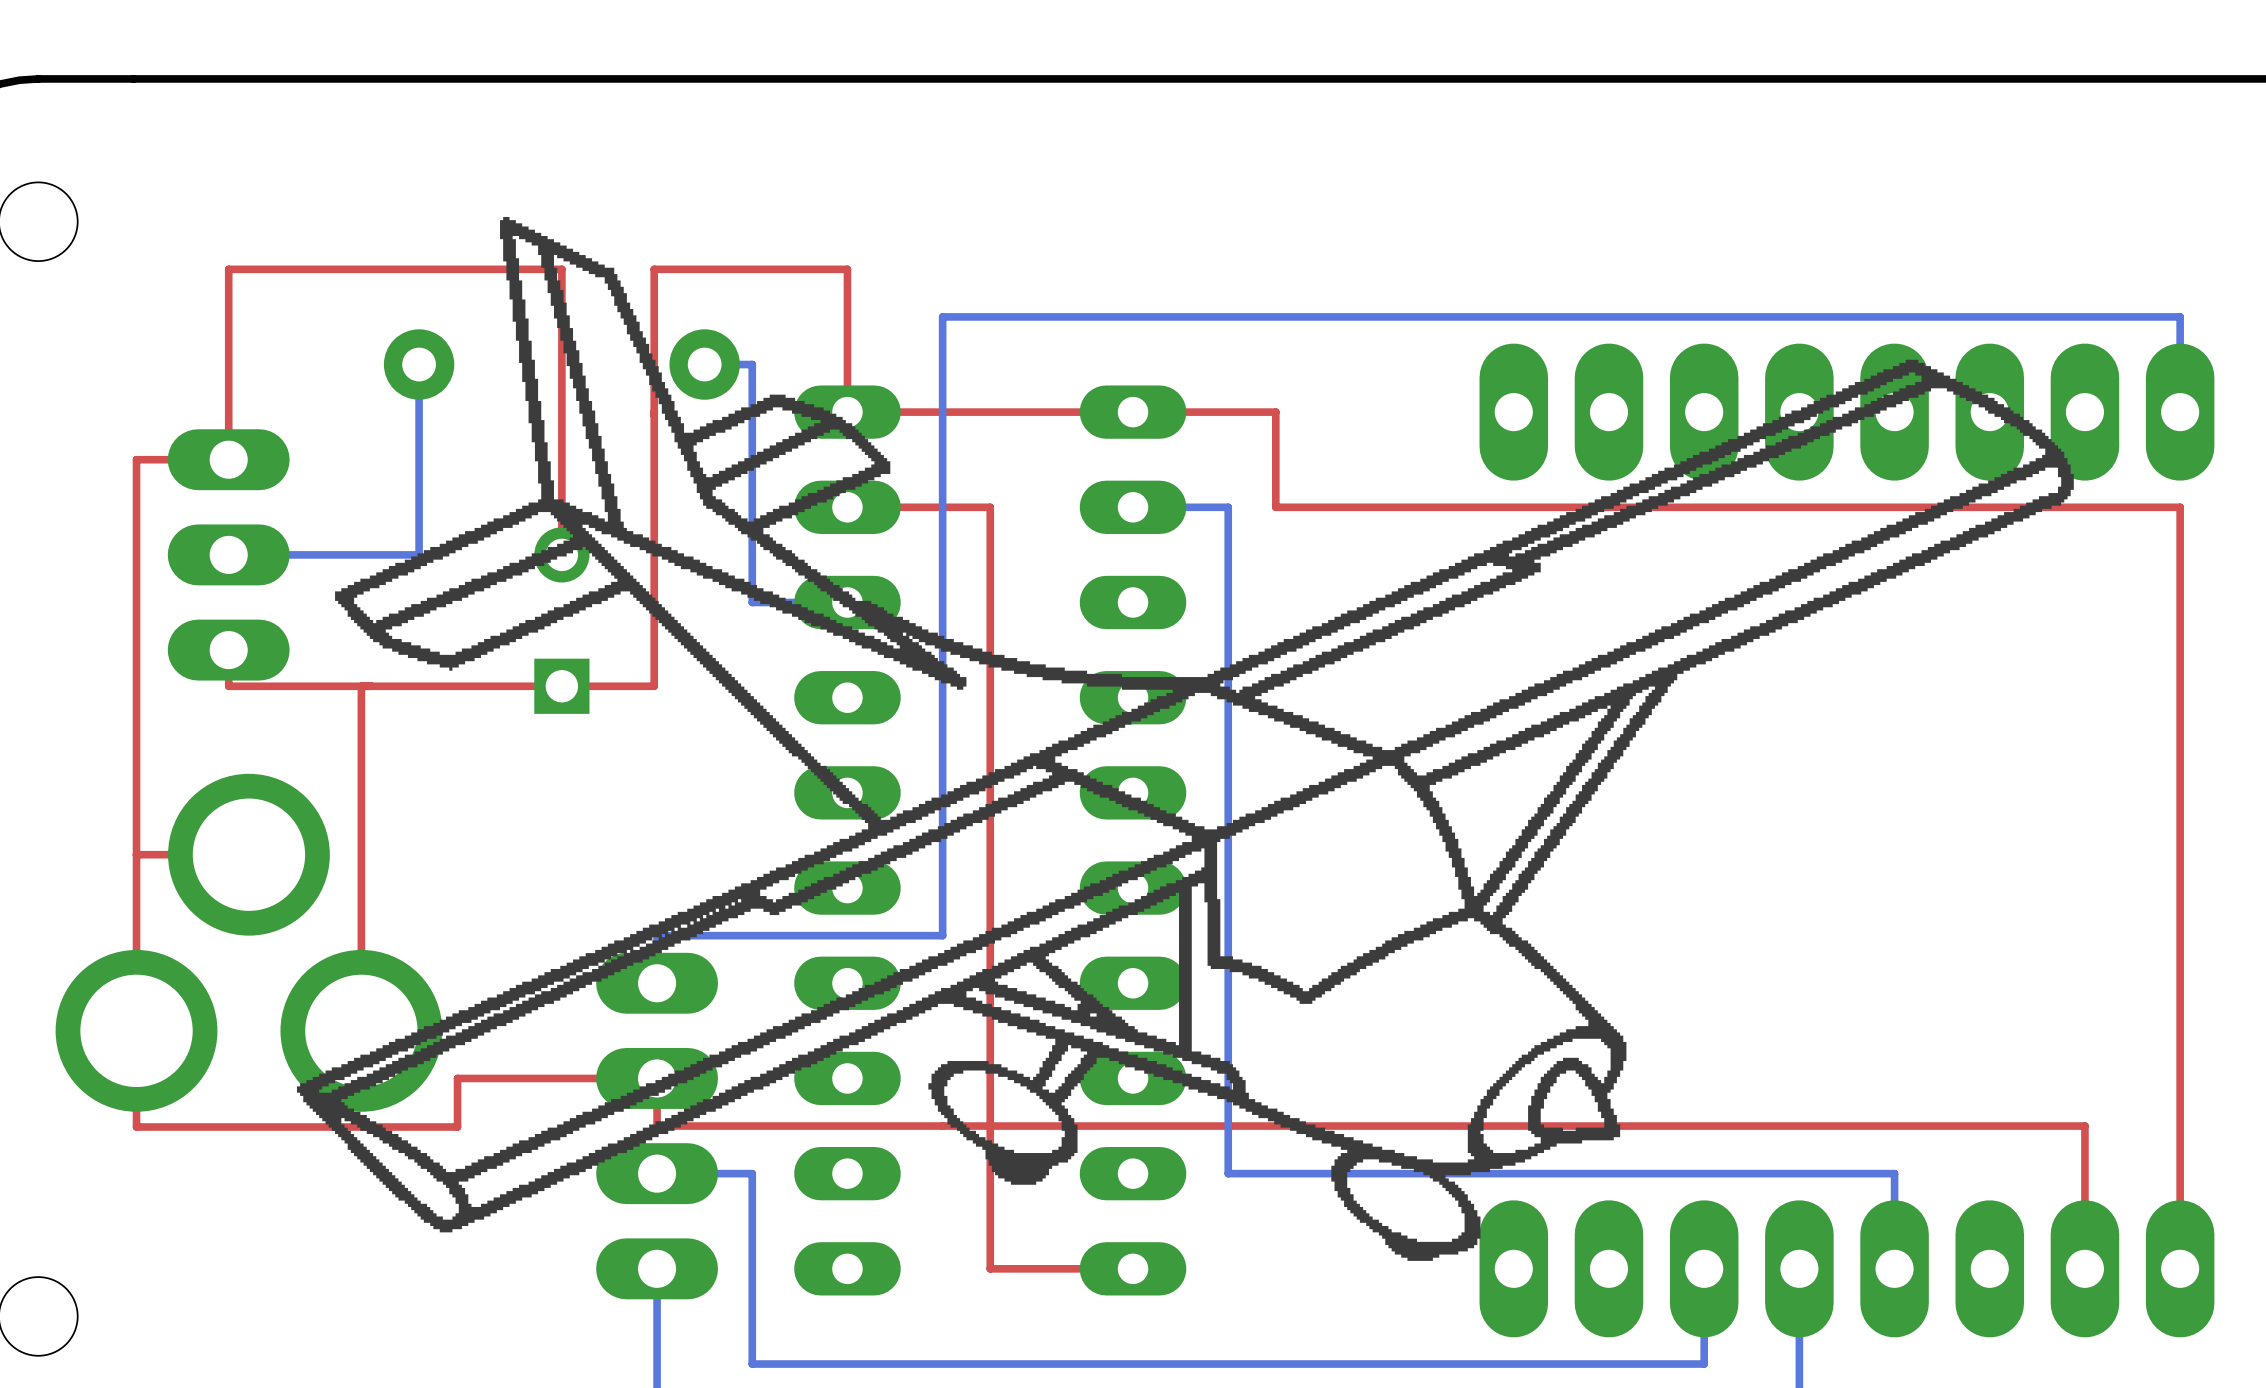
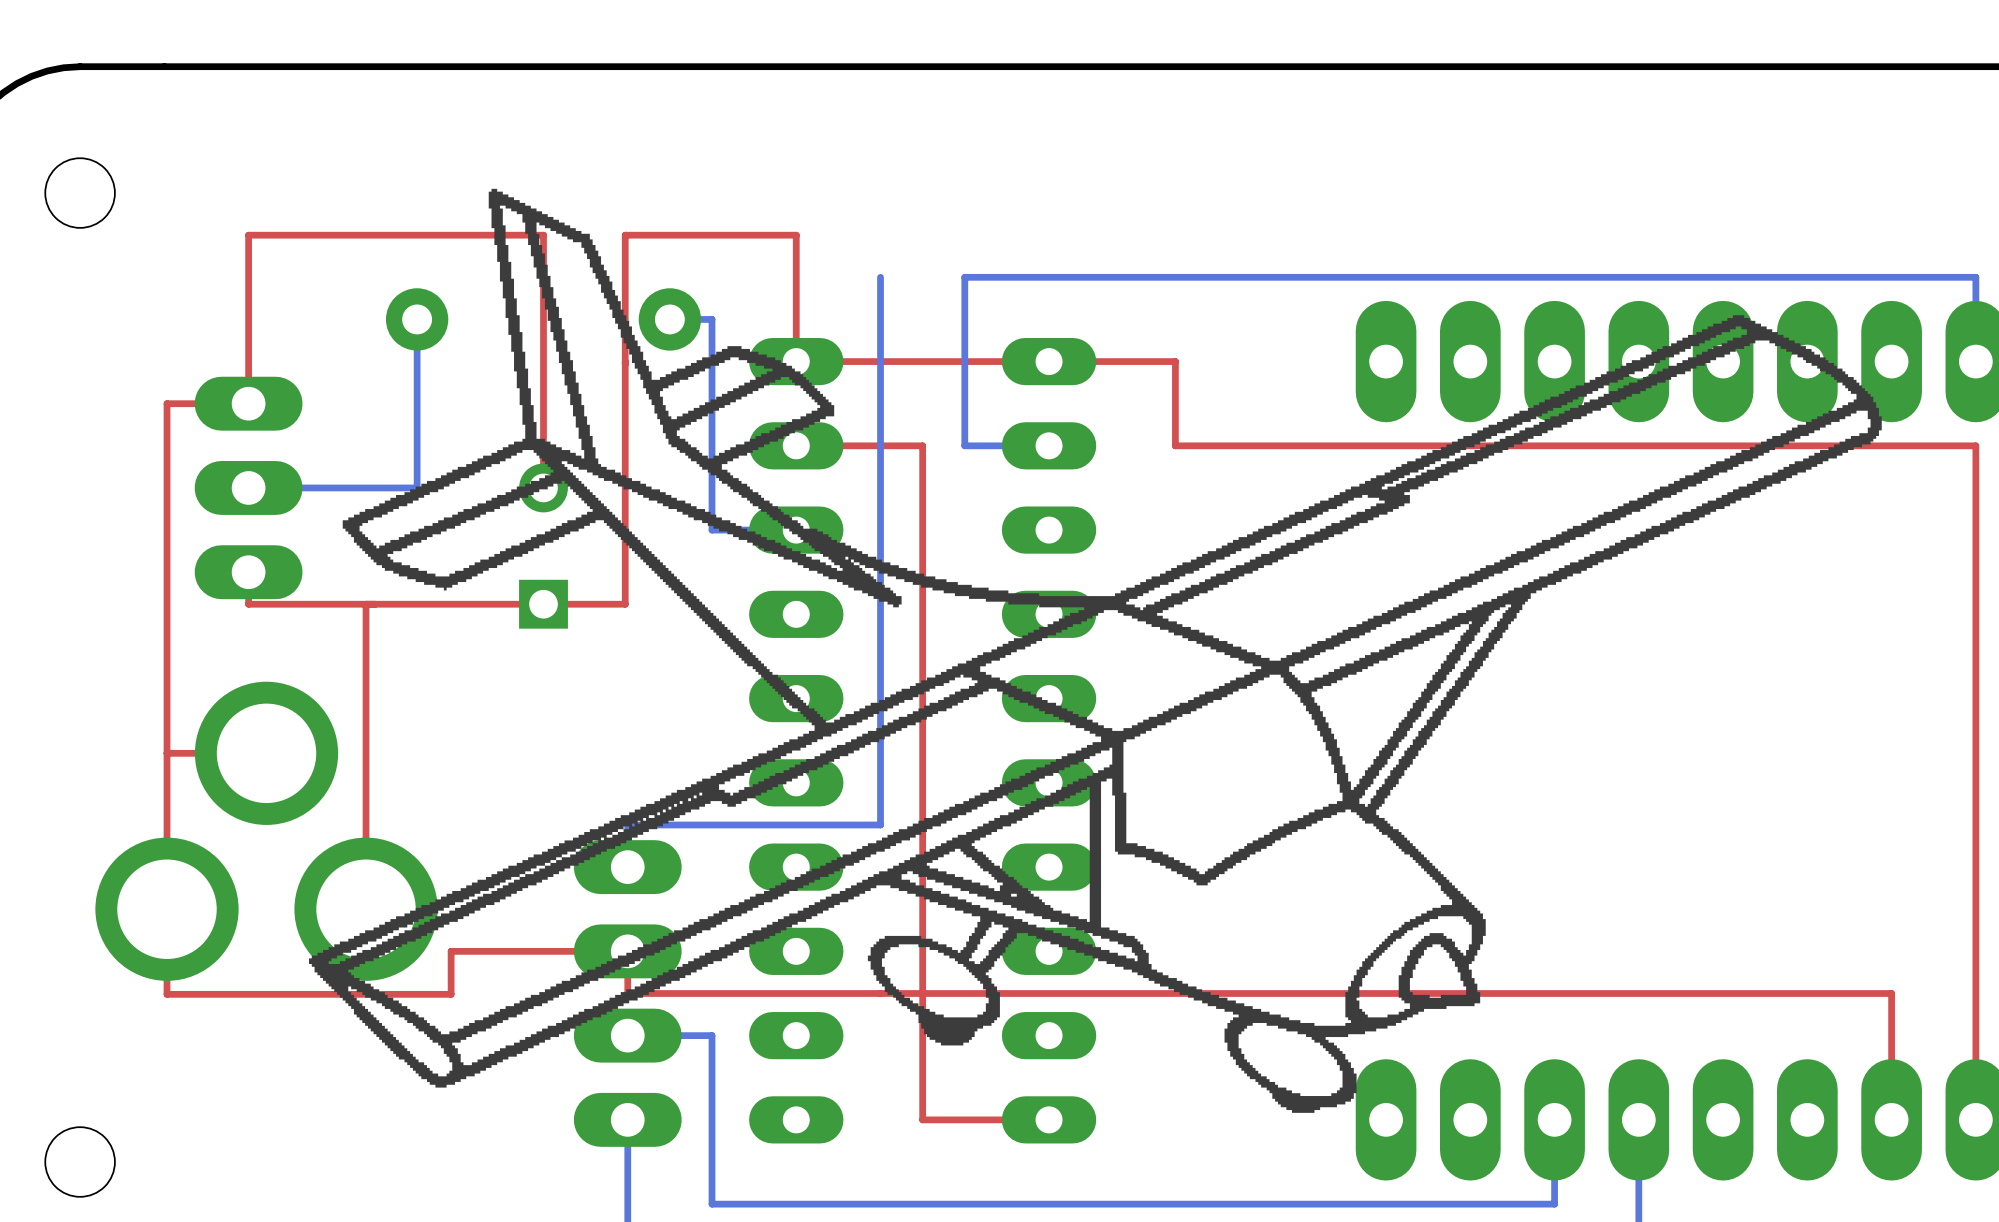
bottom track: (1037, 316) (942, 316) -> (964, 277) (964, 445) (1049, 445)
bottom track: (1133, 507) (1228, 507) (1228, 1173) (1894, 1173) (1894, 1268) -> none

